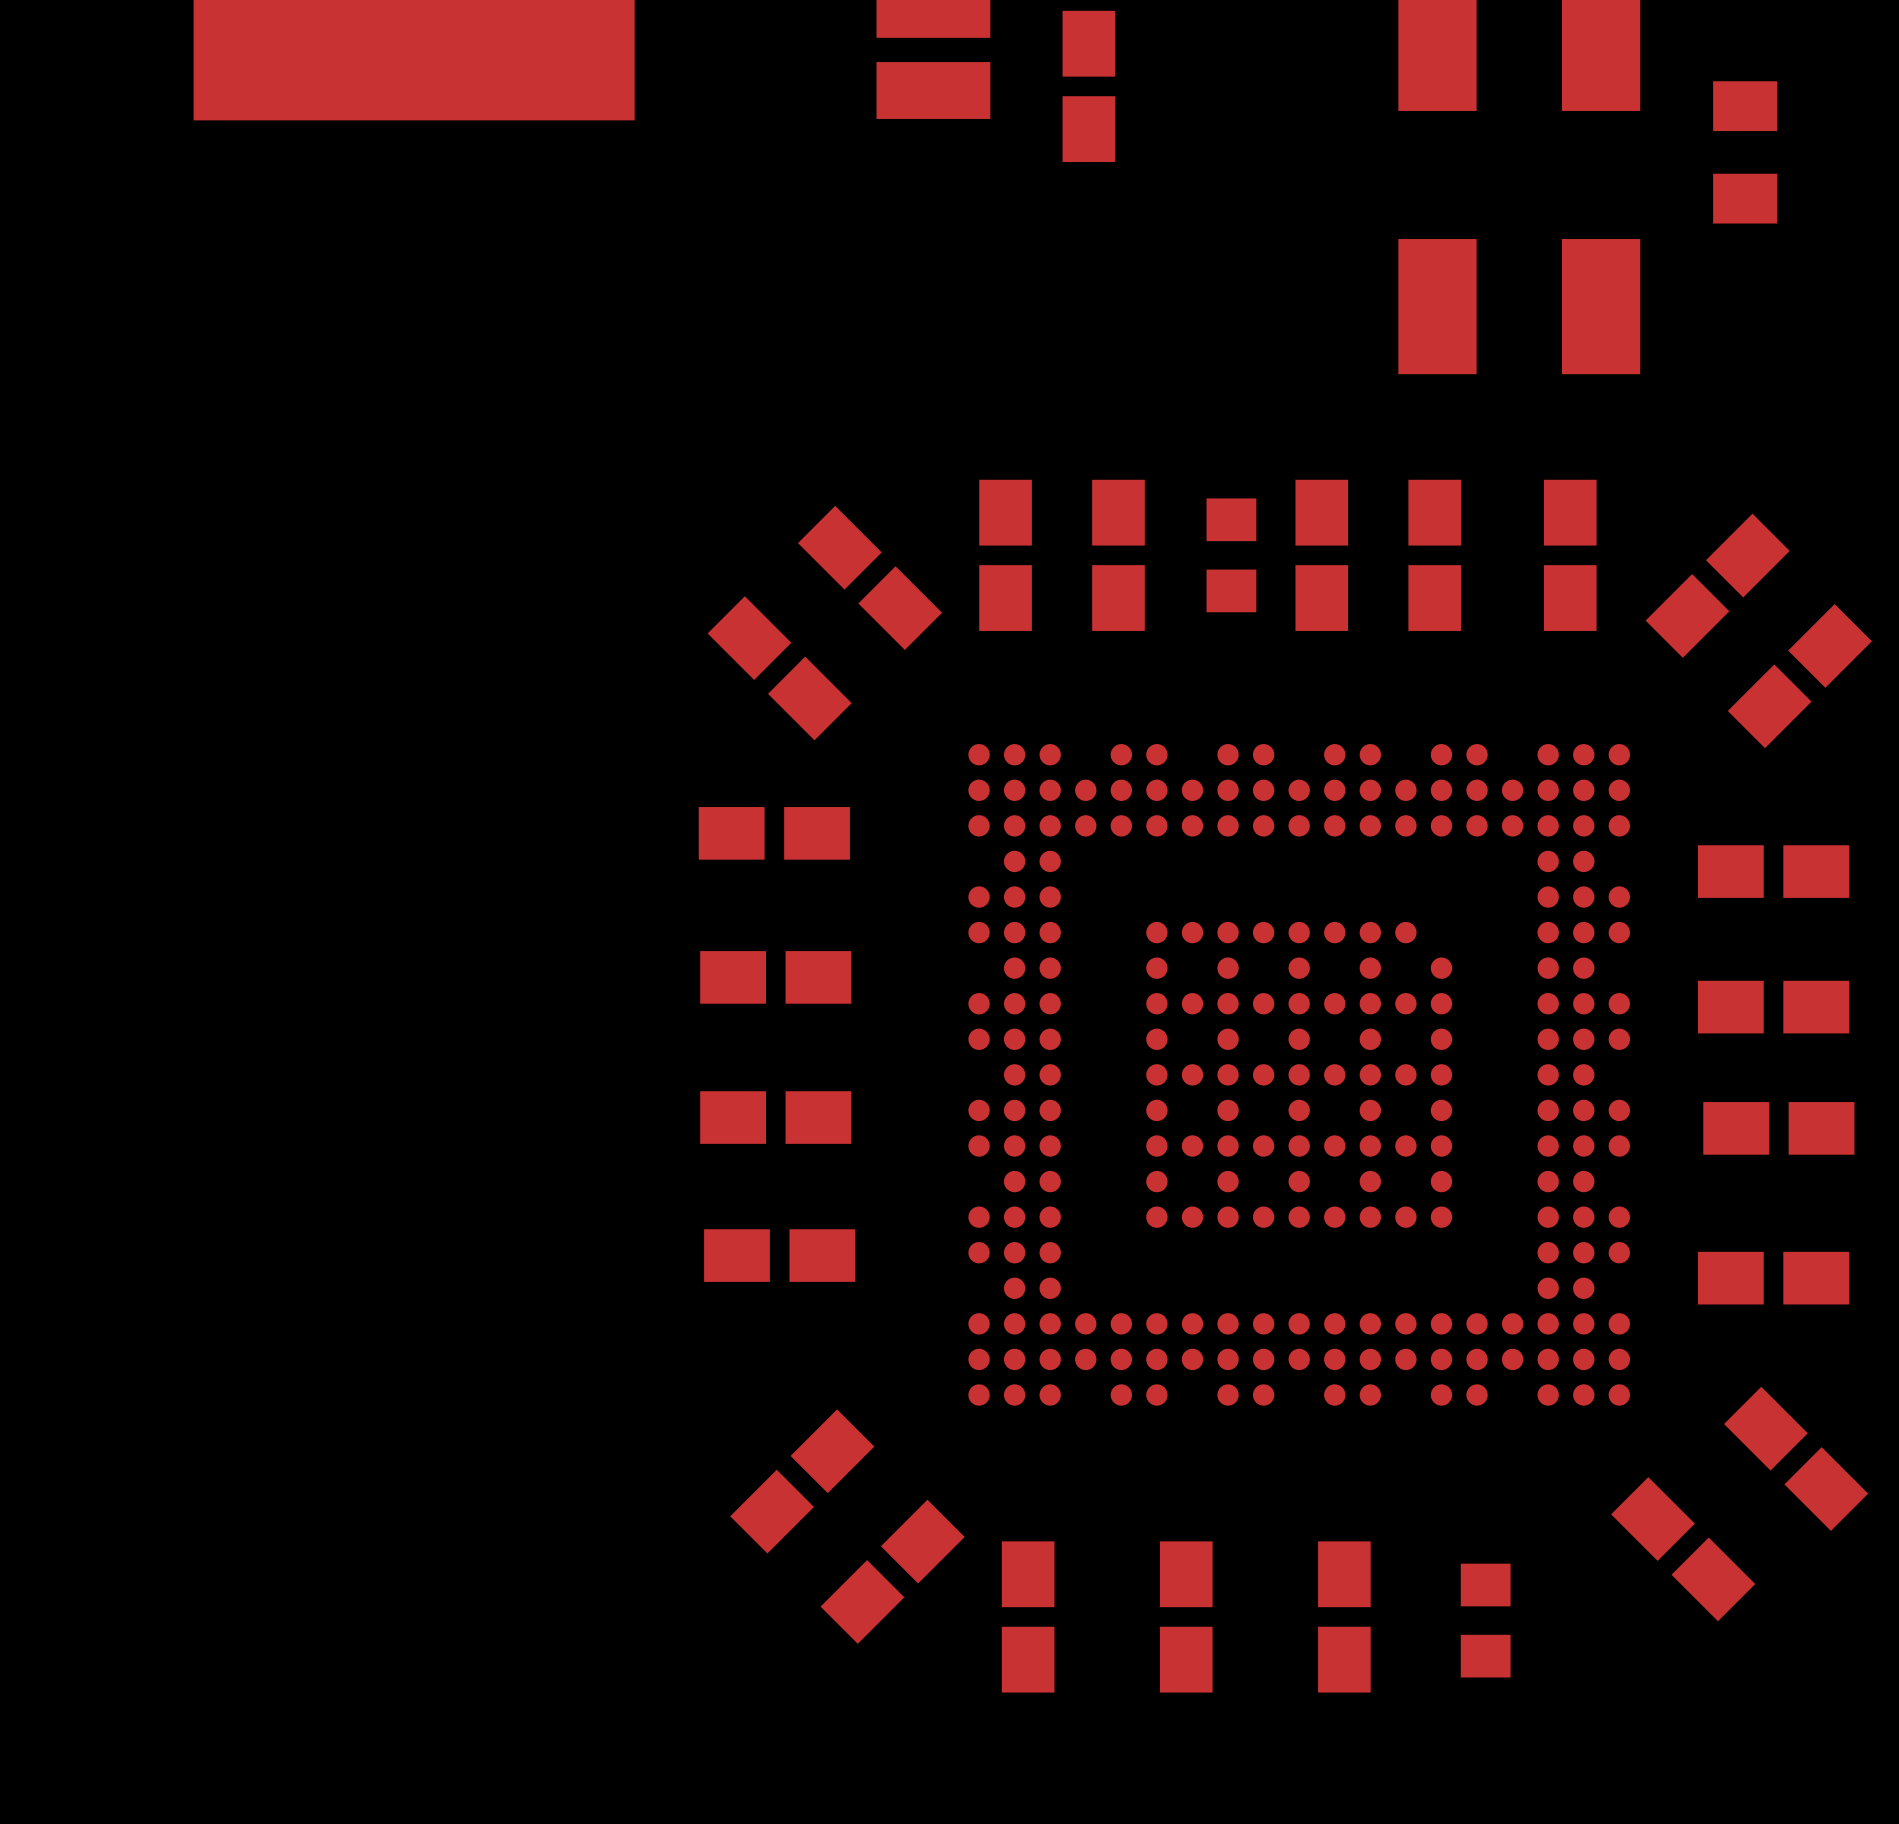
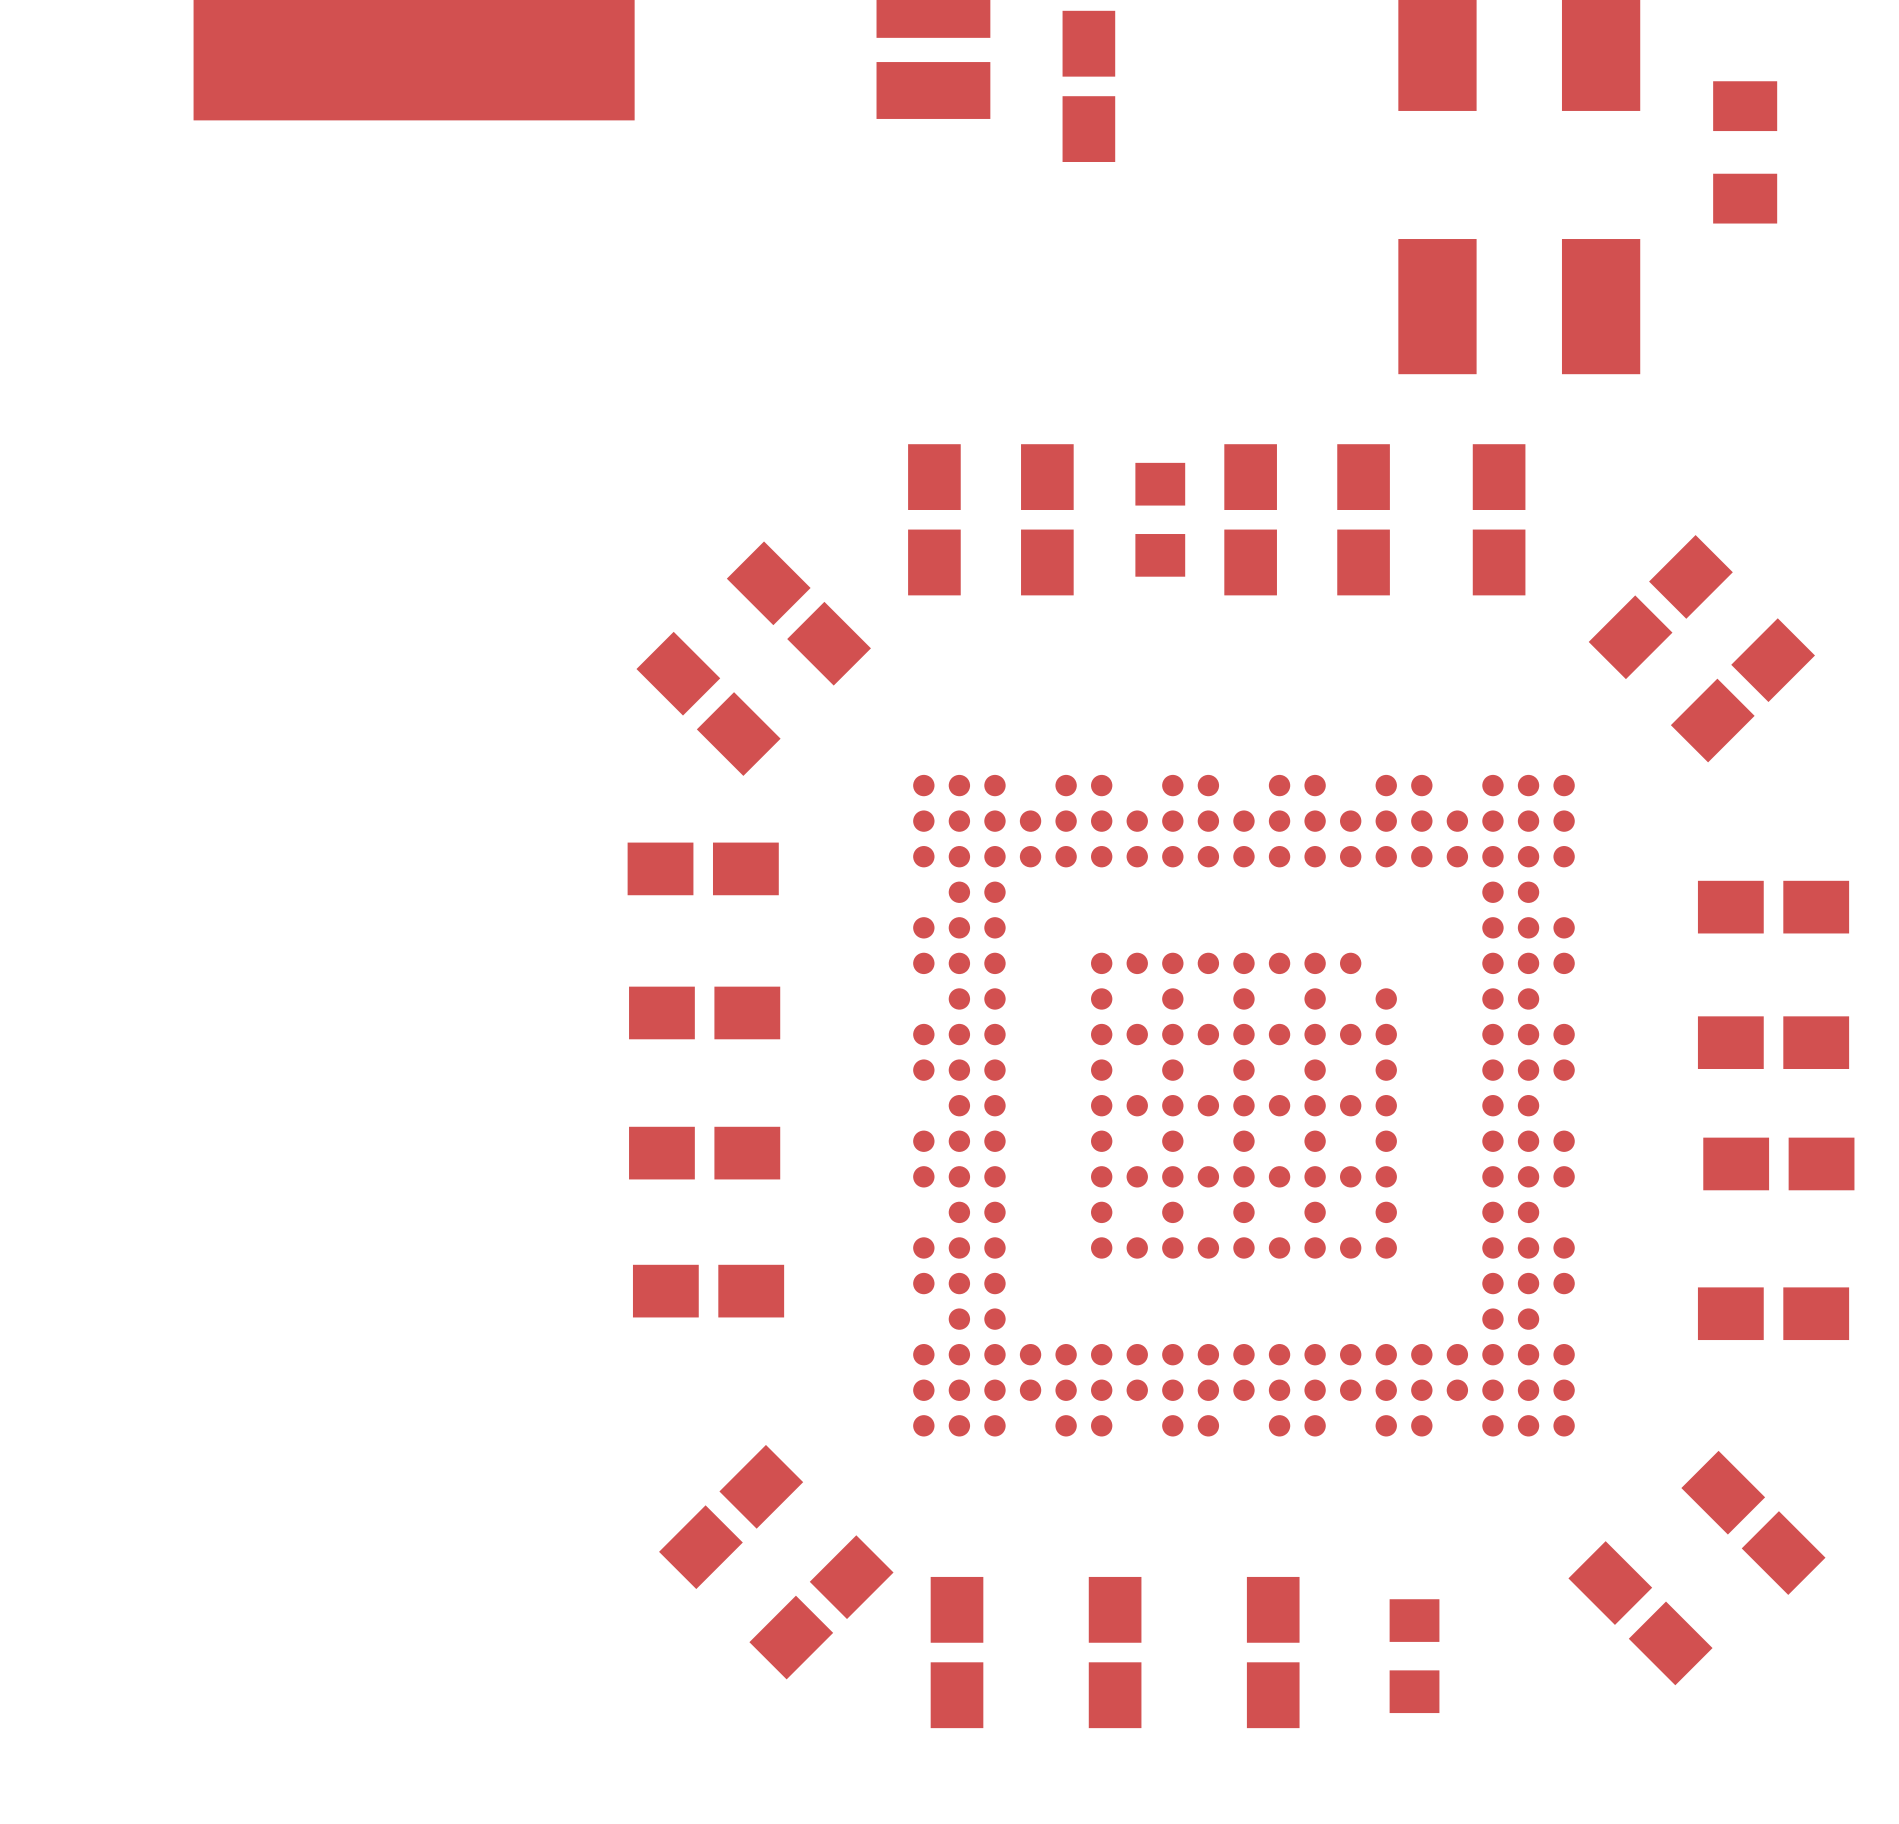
part: none -> (934, 519)
part: none -> (1047, 519)
part: none -> (1250, 519)
part: none -> (1363, 519)
part: none -> (1499, 519)
part: (1005, 555) -> none
part: (1118, 555) -> none
part position: (1231, 555) -> (1160, 519)
part: (1321, 555) -> none
part: (1434, 555) -> none
part: (1570, 555) -> none
part: (870, 577) -> none
part: (1717, 585) -> none
part: none -> (1660, 607)
part: none -> (798, 613)
part: (779, 668) -> none
part: (1799, 676) -> none
part: none -> (1742, 690)
part: none -> (708, 703)
part: (774, 833) -> none
part: none -> (703, 868)
part position: (1773, 871) -> (1773, 907)
part: (775, 977) -> none
part position: (1773, 1007) -> (1773, 1042)
part: none -> (704, 1012)
part position: (1299, 1074) -> (1243, 1105)
part: (775, 1117) -> none
part position: (1778, 1128) -> (1778, 1163)
part: none -> (704, 1153)
part: (779, 1255) -> none
part position: (1773, 1278) -> (1773, 1313)
part: none -> (708, 1291)
part: (1796, 1458) -> none
part: (802, 1481) -> none
part: none -> (731, 1517)
part: none -> (1753, 1522)
part: (1683, 1549) -> none
part: (892, 1571) -> none
part: none -> (821, 1607)
part: none -> (1640, 1613)
part: (1028, 1616) -> none
part: (1186, 1616) -> none
part: (1344, 1616) -> none
part position: (1485, 1620) -> (1414, 1656)
part: none -> (957, 1652)
part: none -> (1115, 1652)
part: none -> (1273, 1652)

